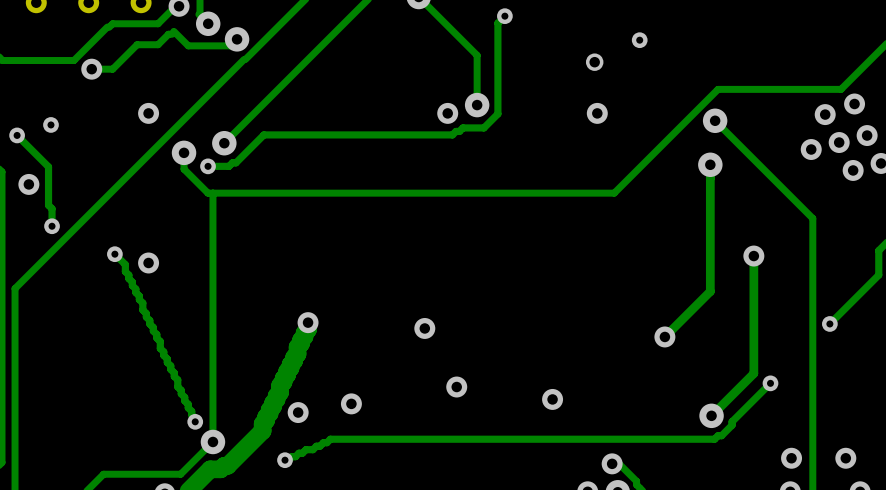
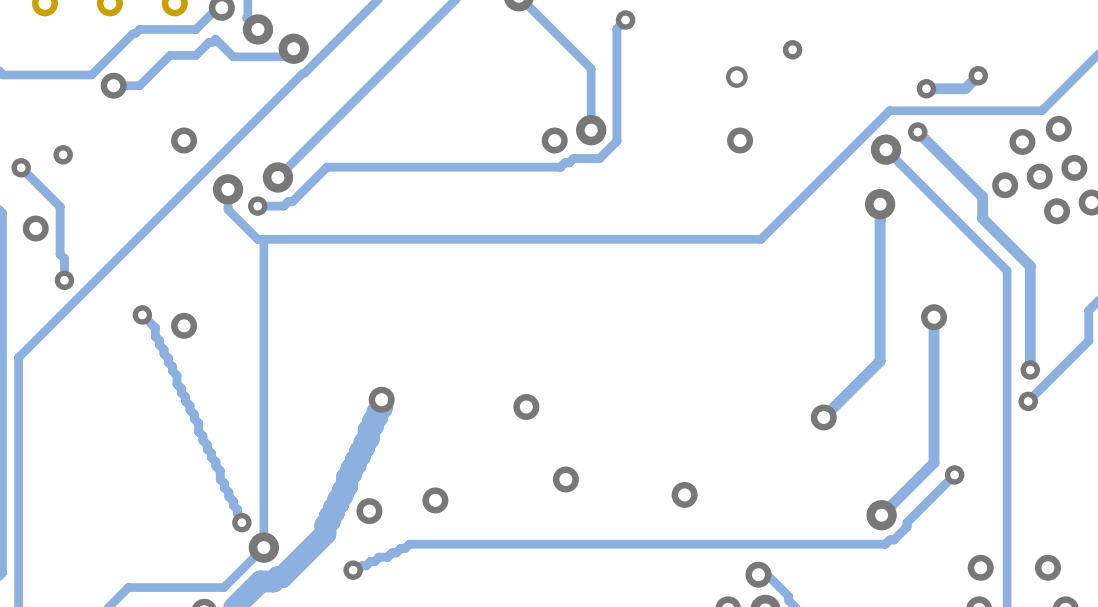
track: none -> (978, 75) (965, 88) (926, 88)
via: none -> (978, 75)
via: none -> (926, 88)
track: none -> (917, 132) (982, 196) (982, 218) (1030, 266) (1030, 370)
via: none -> (917, 132)
via: none -> (1030, 370)

